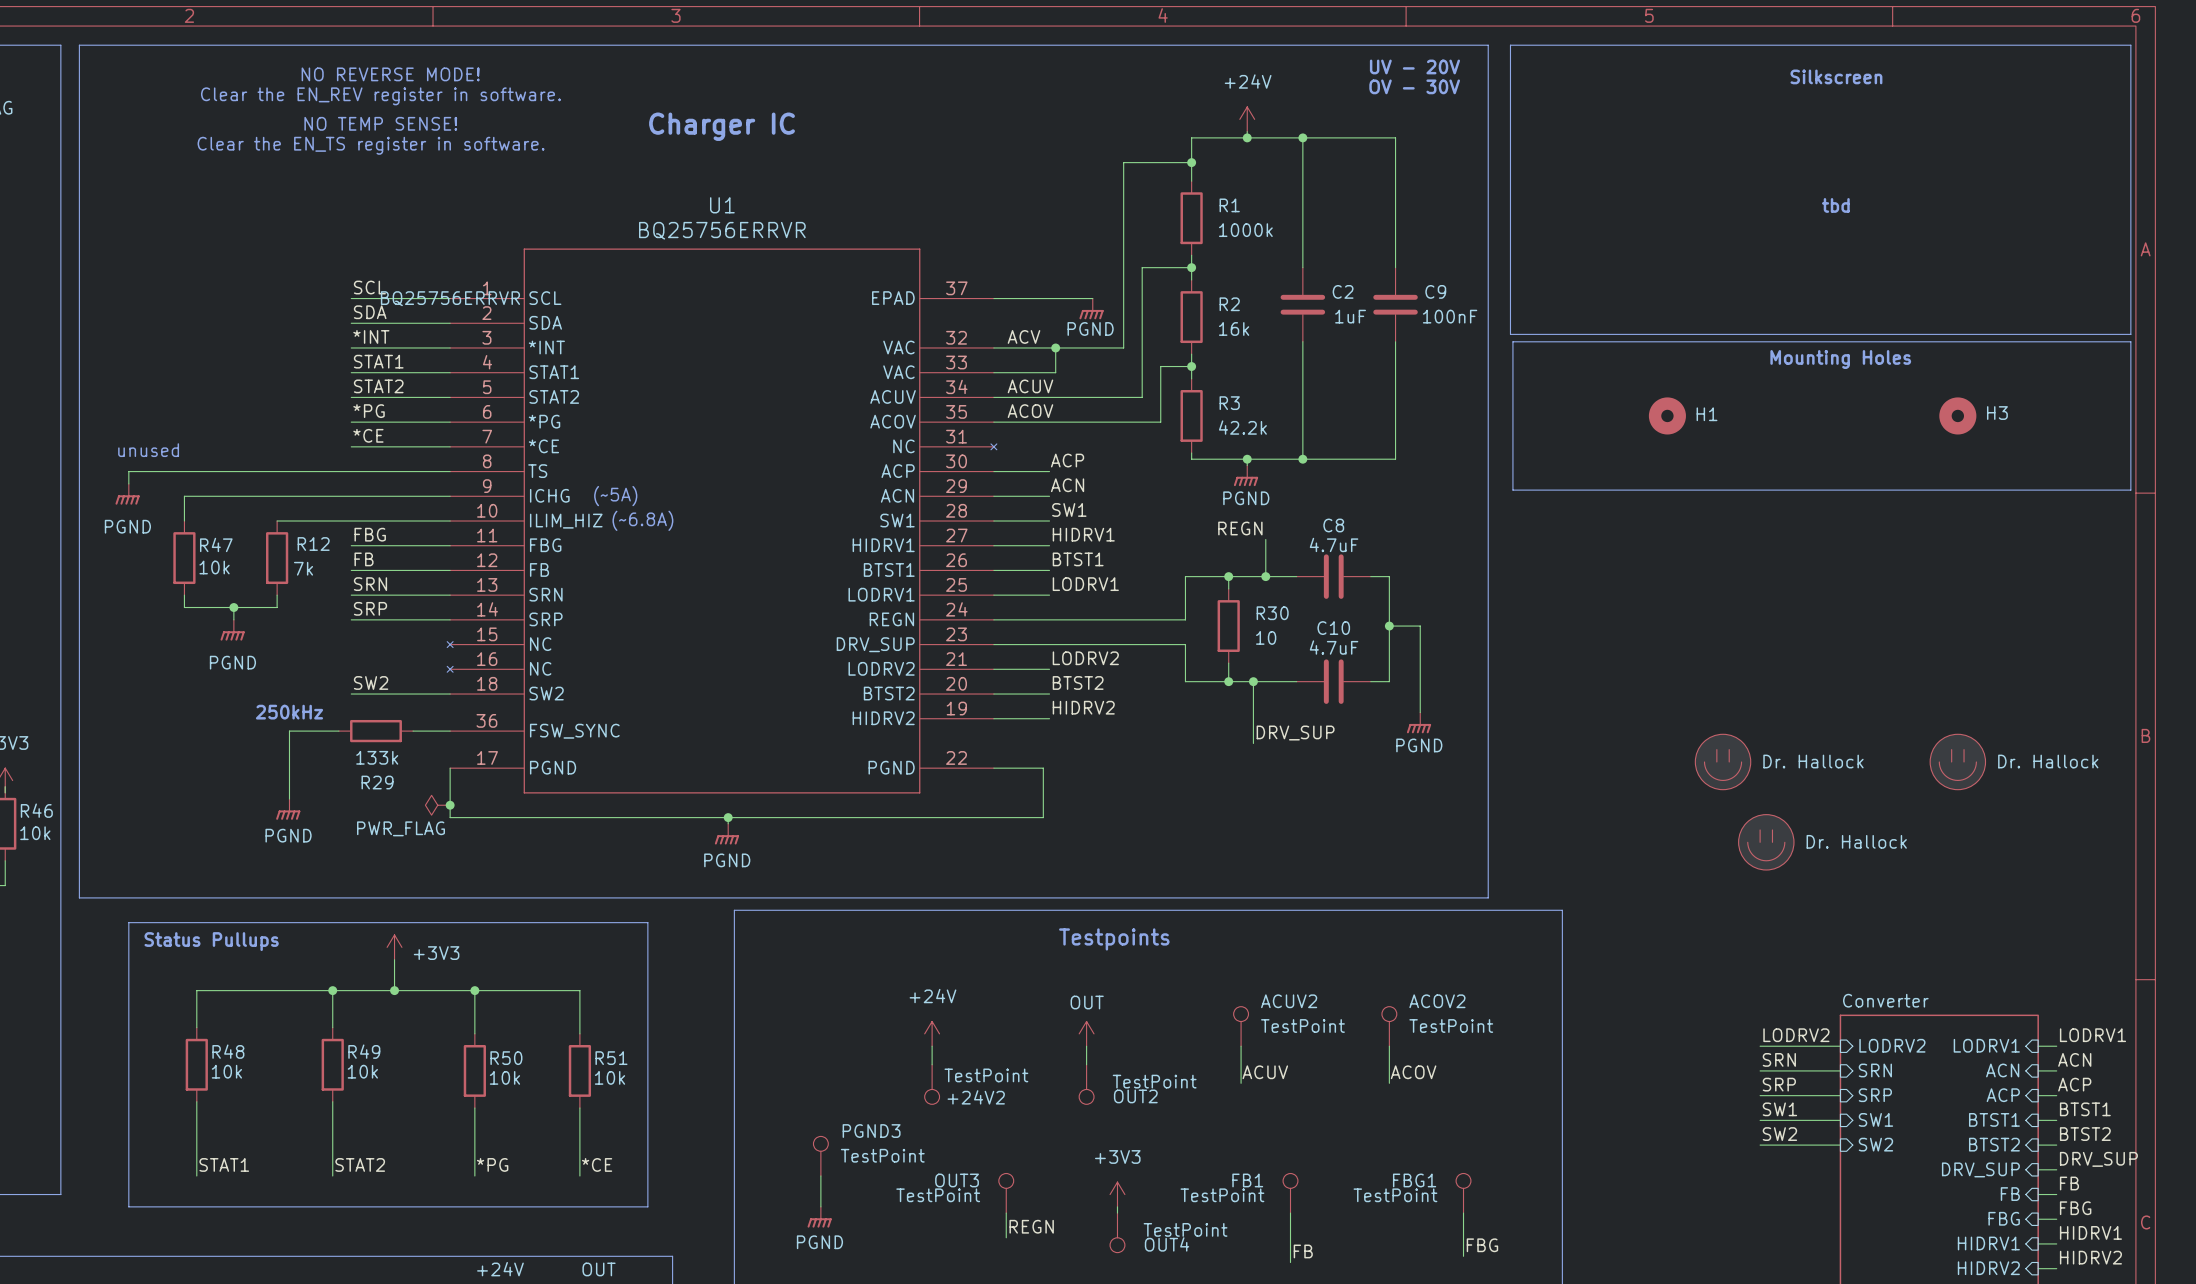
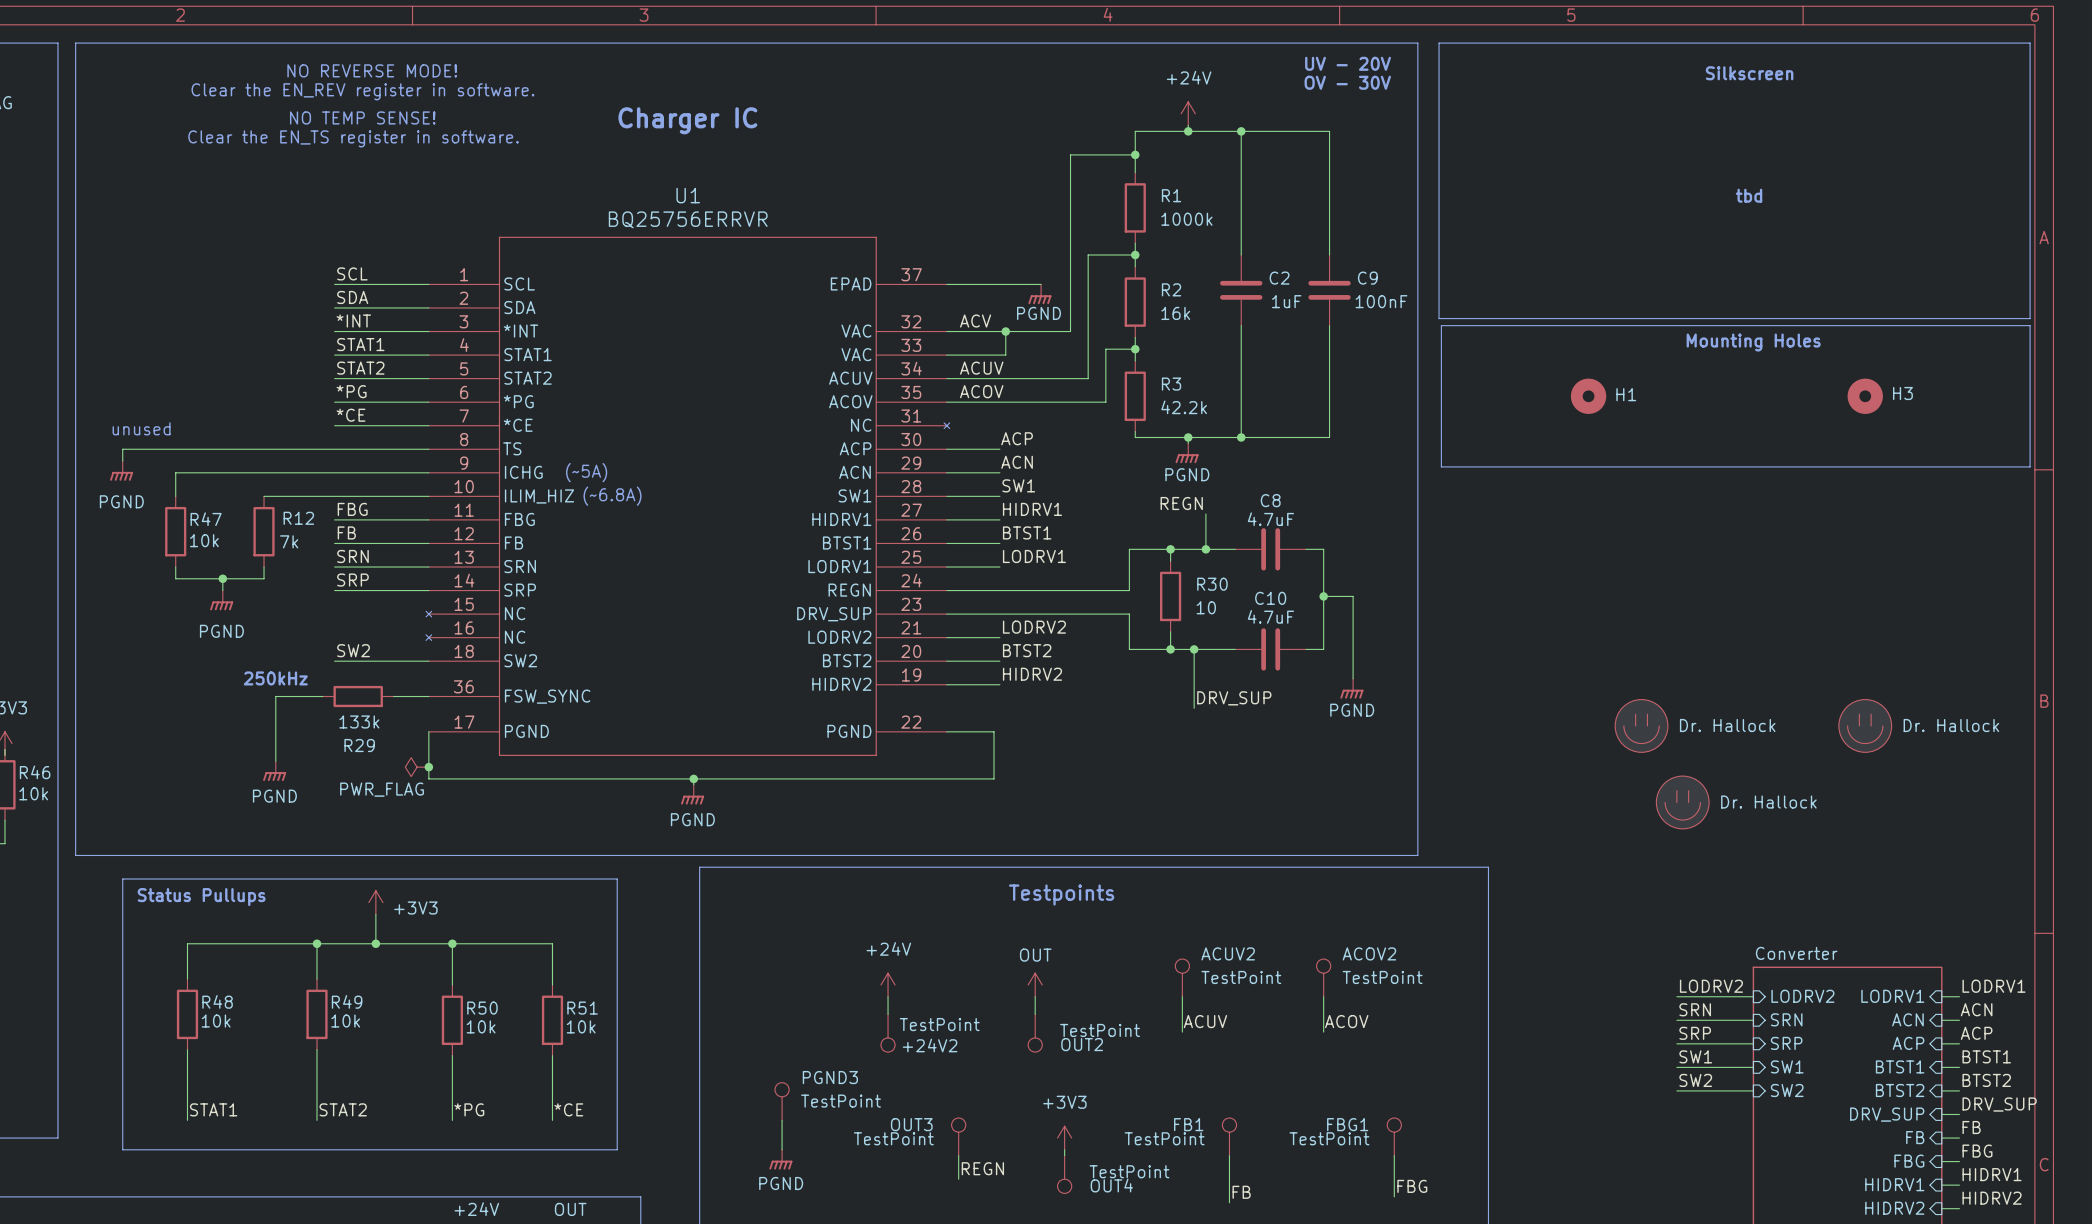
U1 text: BQ25756ERRVR (450, 298) -> none

